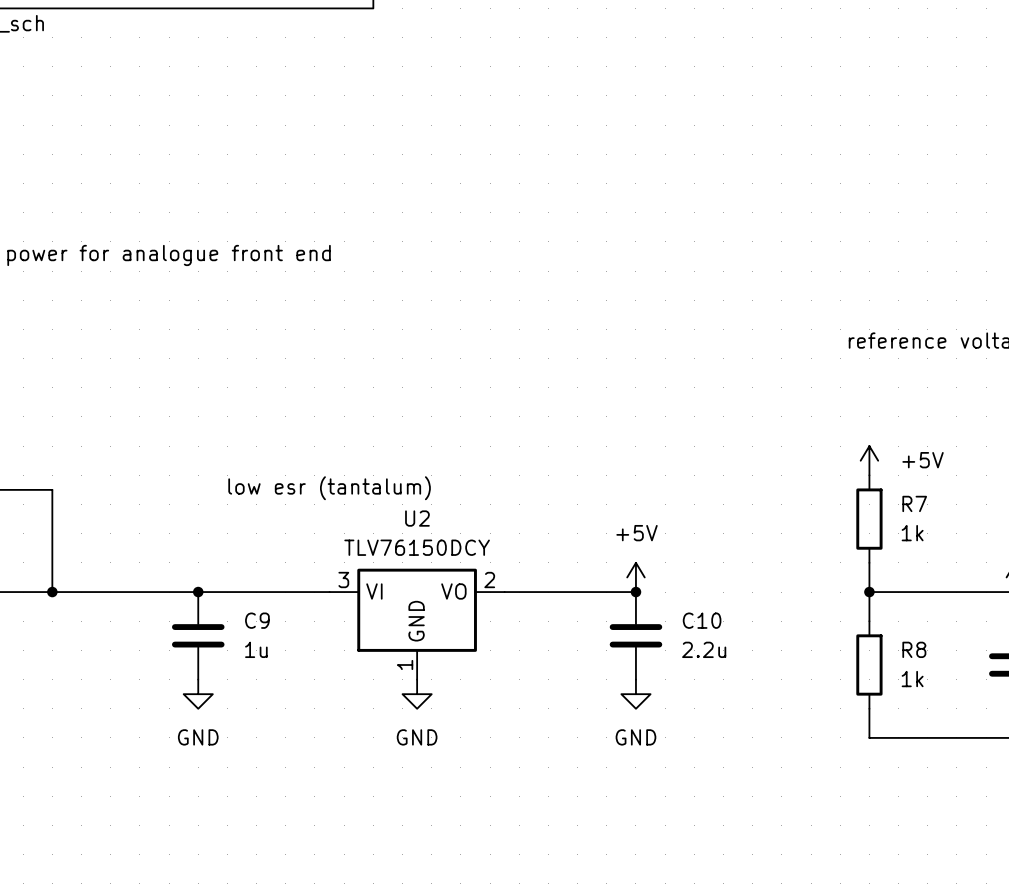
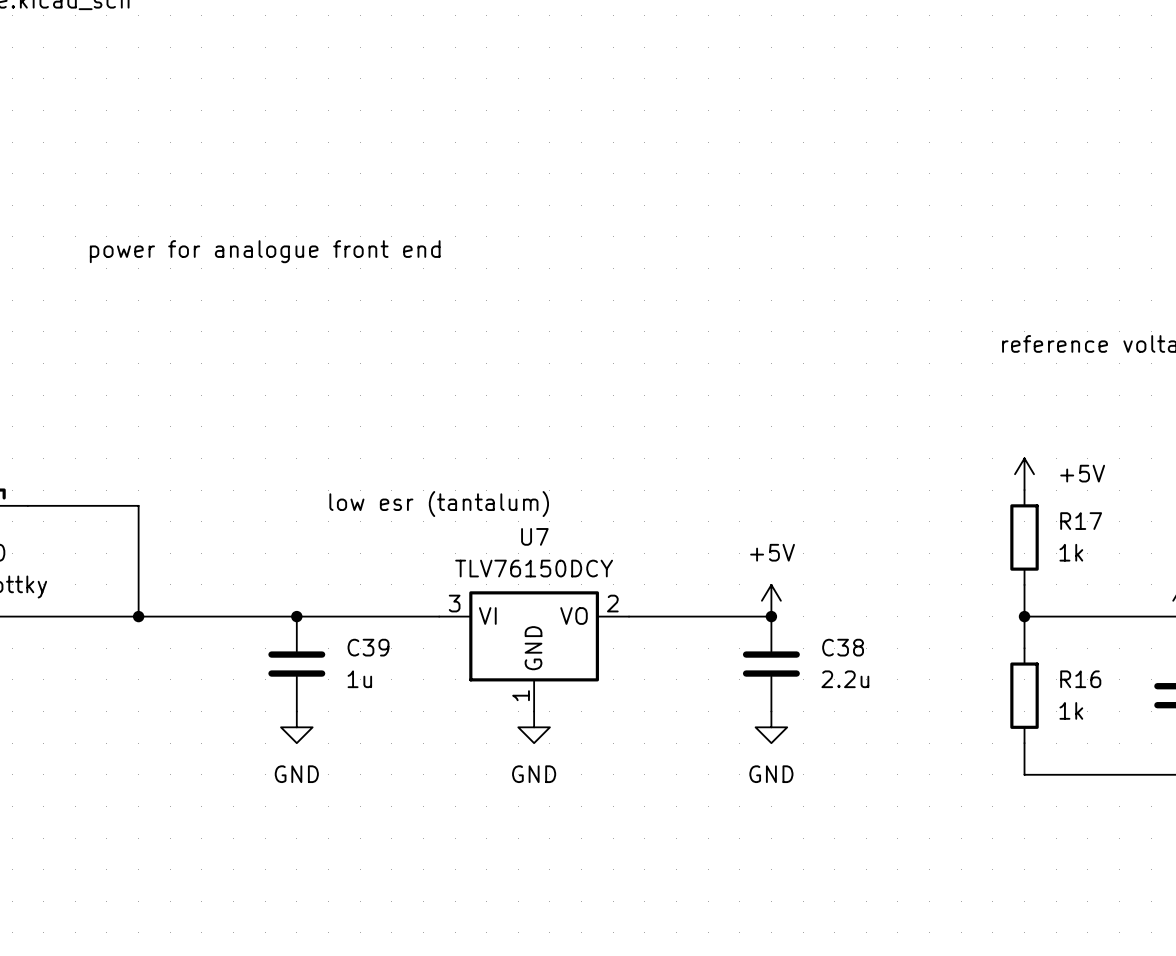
R7 name: R7 (914, 503) -> R17 (1081, 521)
U2 name: U2 (417, 518) -> U7 (534, 536)
C9 name: C9 (257, 620) -> C39 (368, 647)
C10 name: C10 (702, 620) -> C38 (843, 647)
R8 name: R8 (914, 649) -> R16 (1080, 679)

